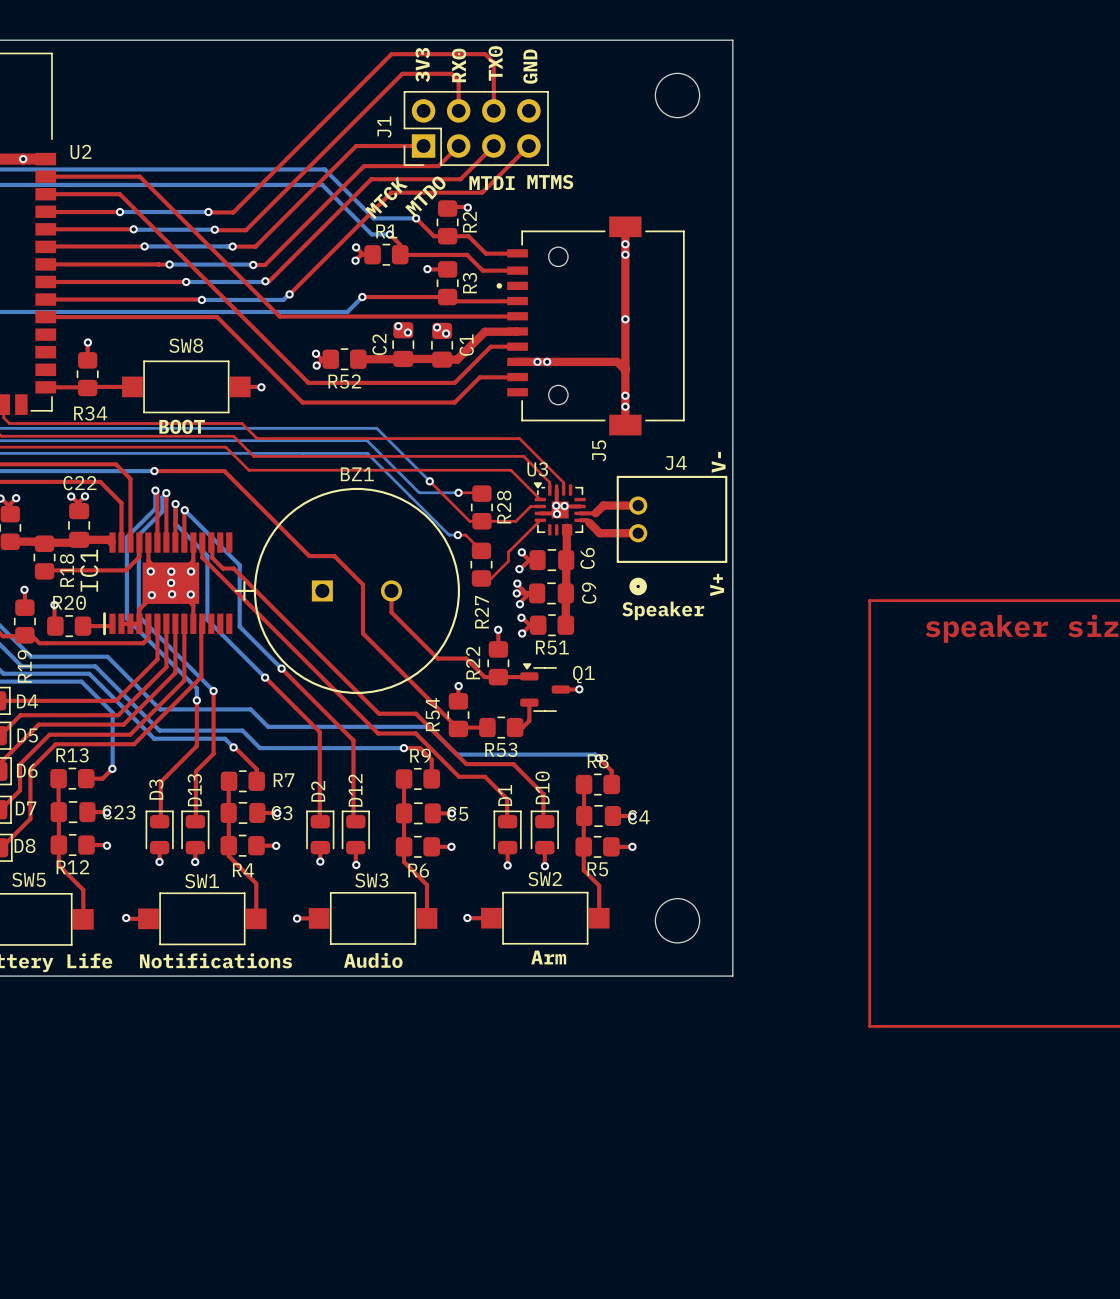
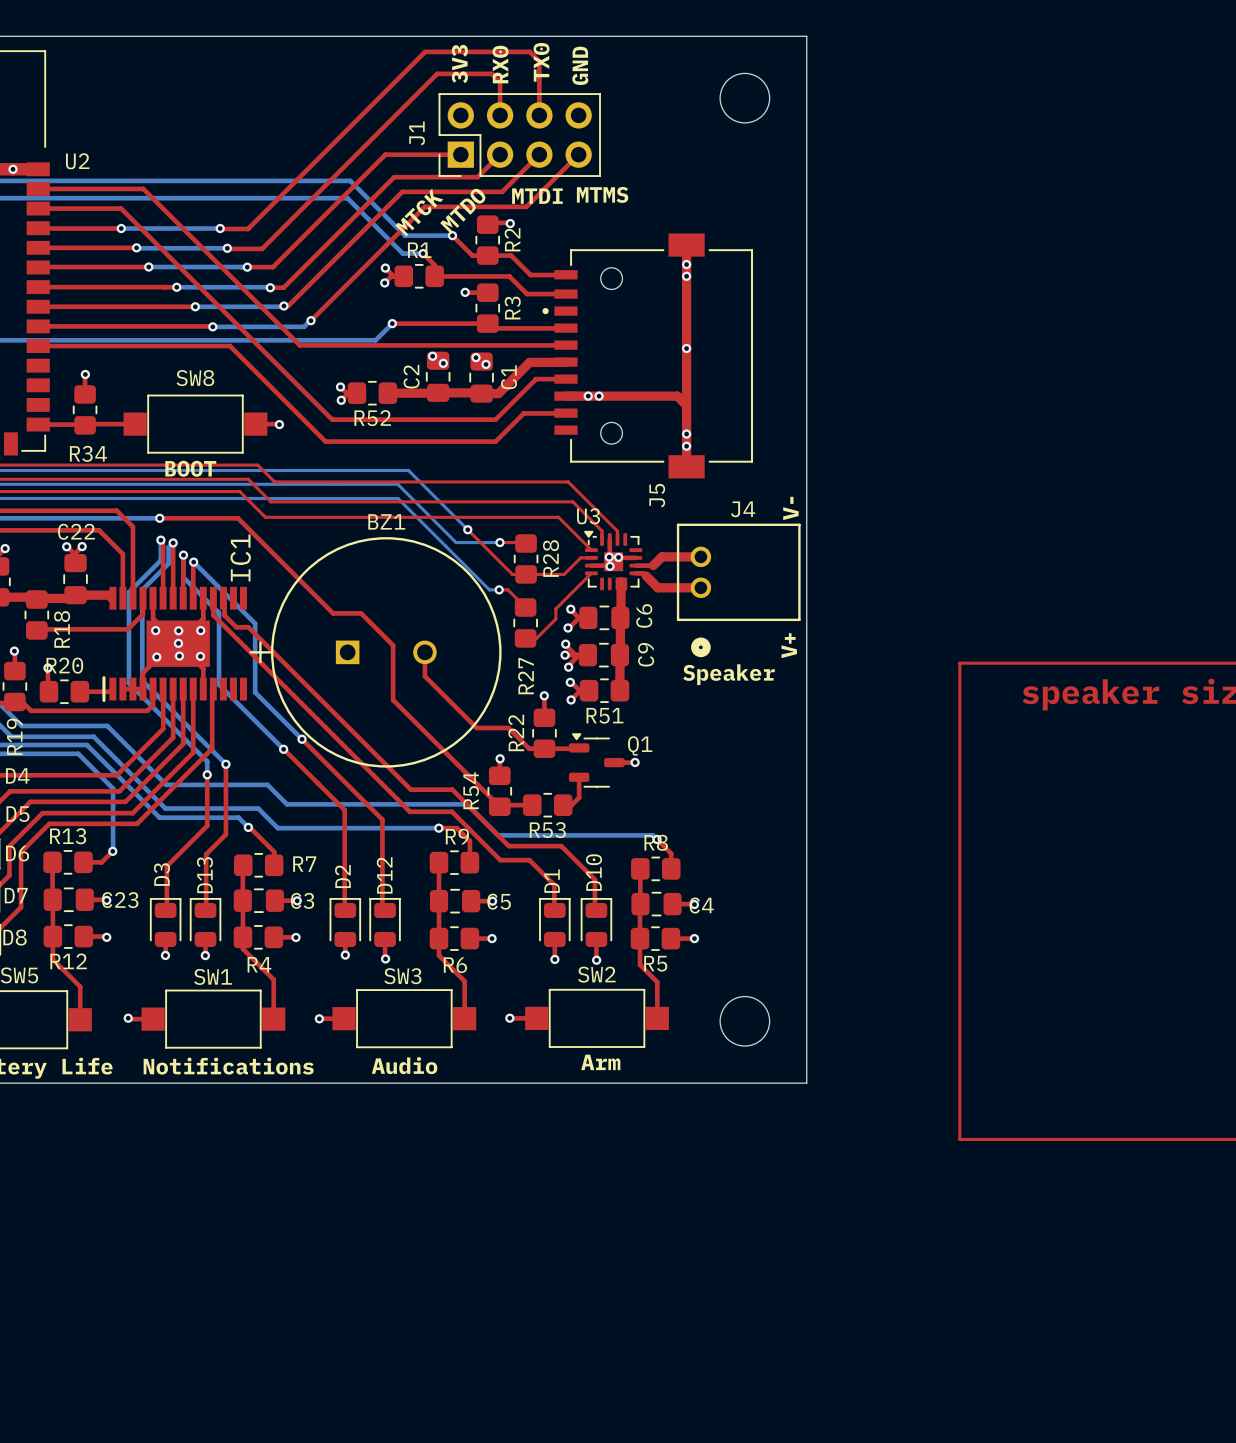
IC1 name position: IC1 (89, 570) -> IC1 (240, 557)

